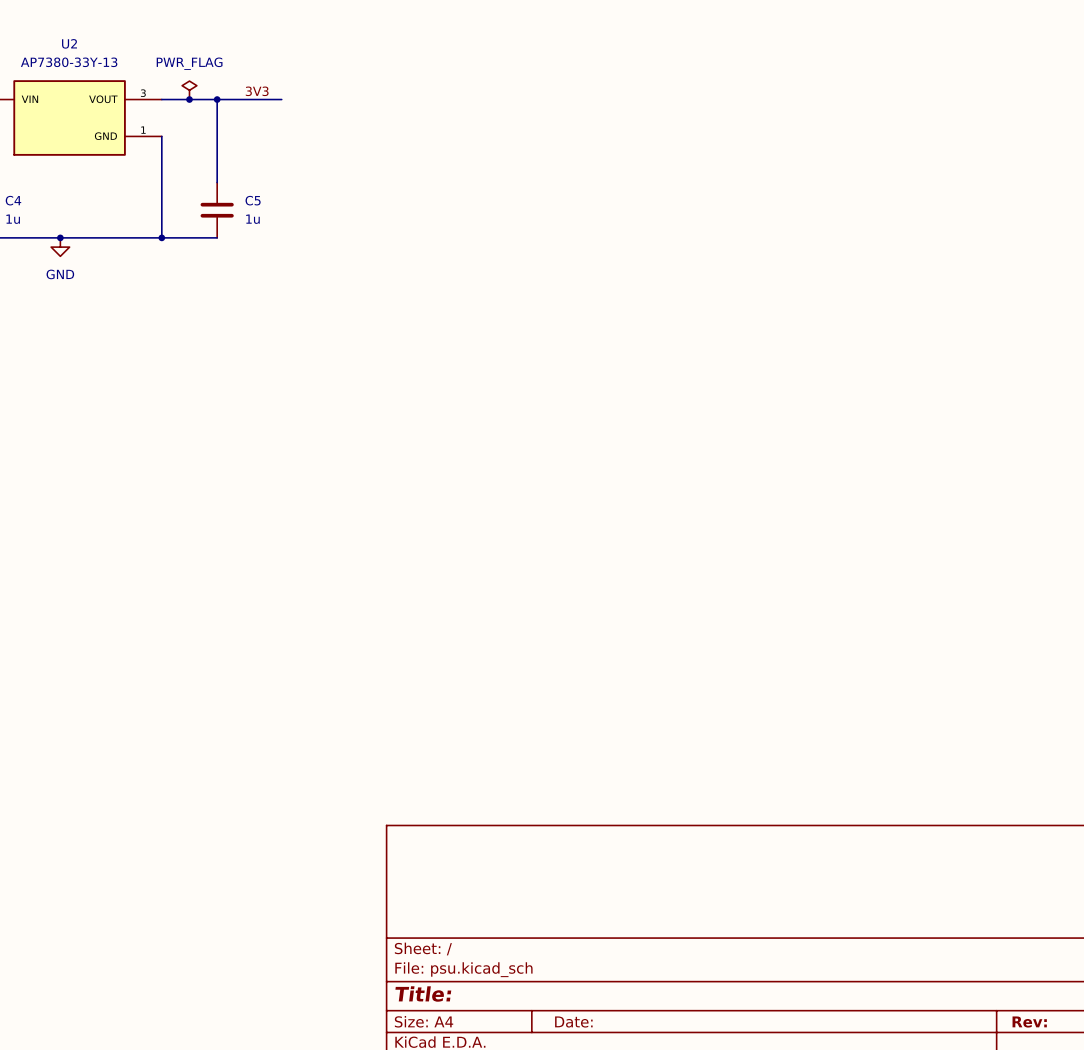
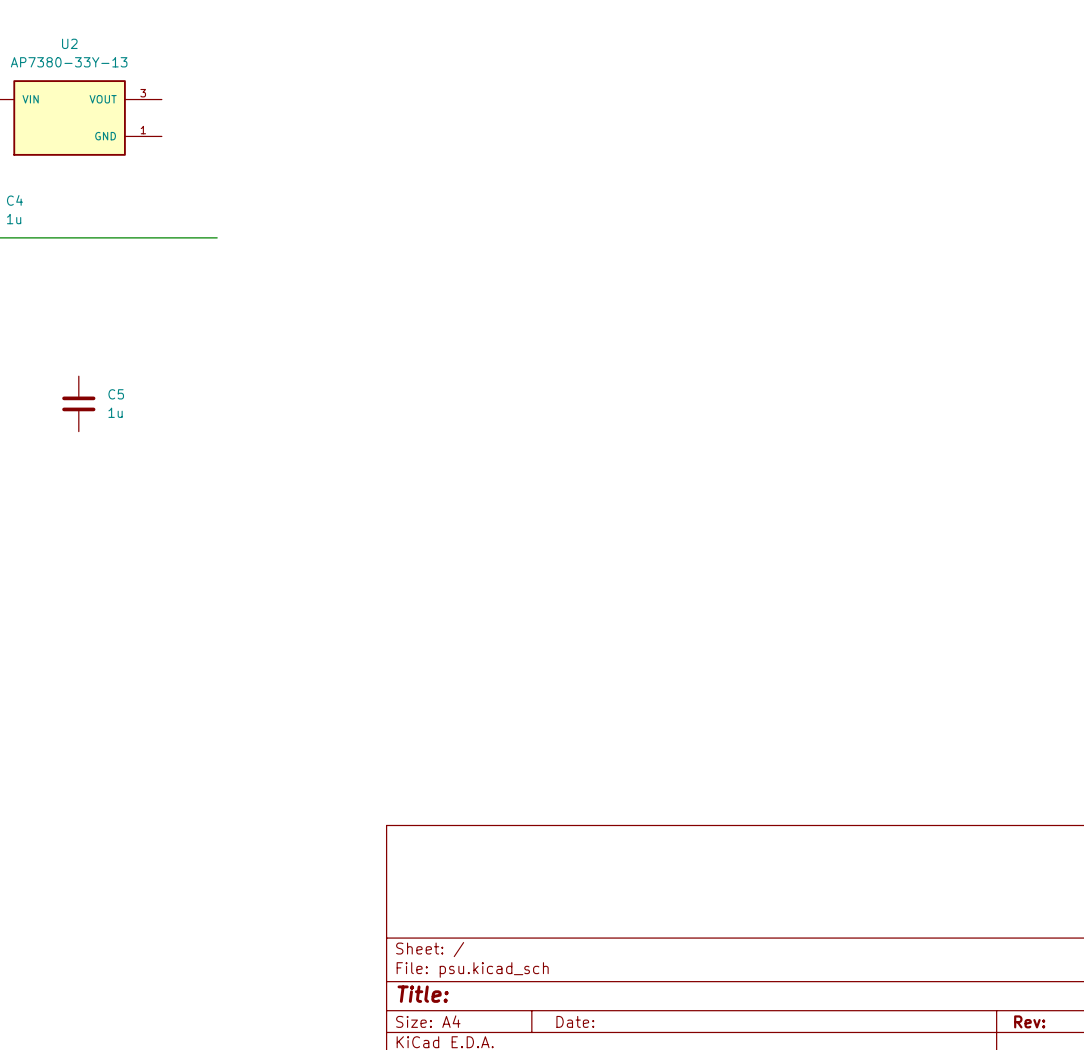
power symbol: PWR_FLAG (189, 90) -> none
label: 3V3 (257, 91) -> none
wire: (161, 99) (281, 99) -> none
junction: (189, 99) -> none
wire: (217, 99) (217, 182) -> none
junction: (217, 99) -> none
wire: (161, 136) (161, 237) -> none
C5 position: (217, 210) -> (78, 403)
junction: (60, 237) -> none
junction: (161, 237) -> none
power symbol: GND (60, 247) -> none

